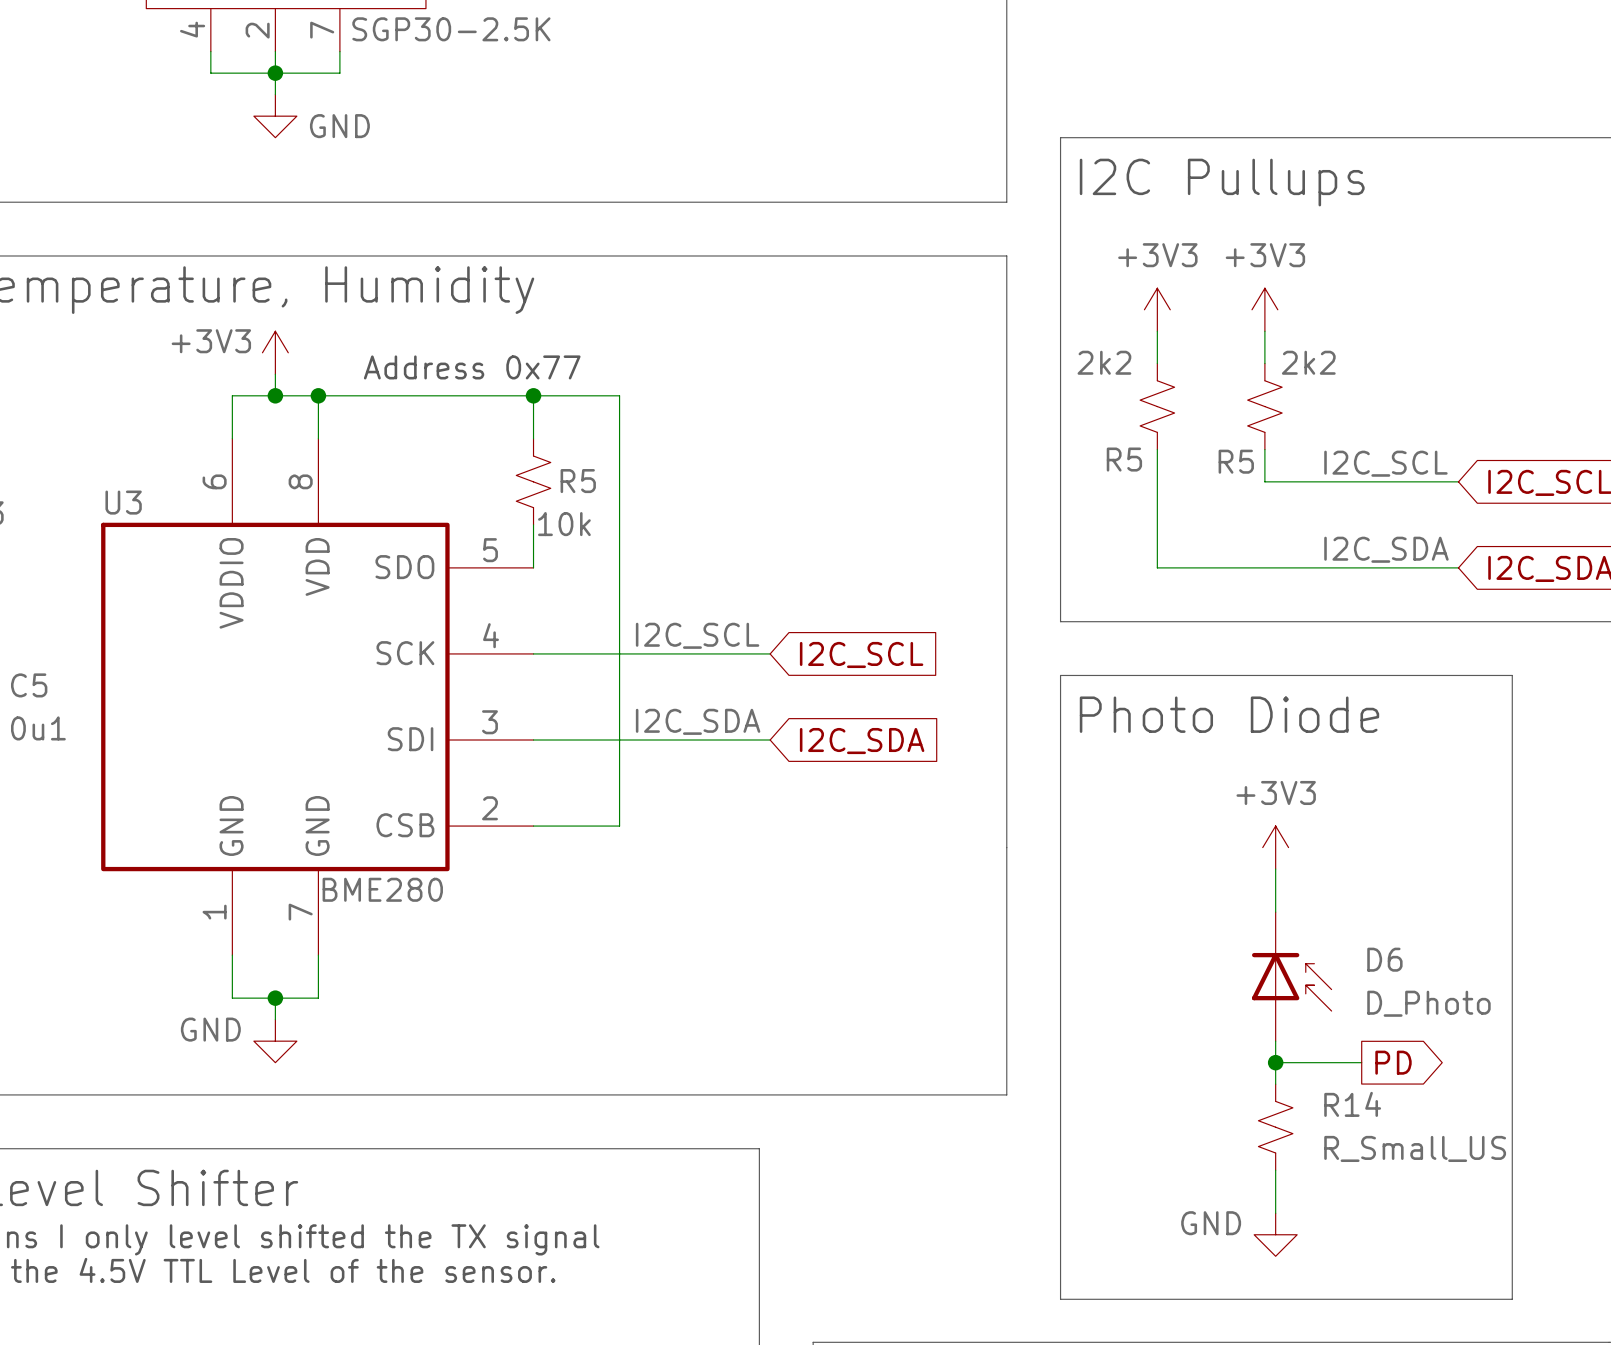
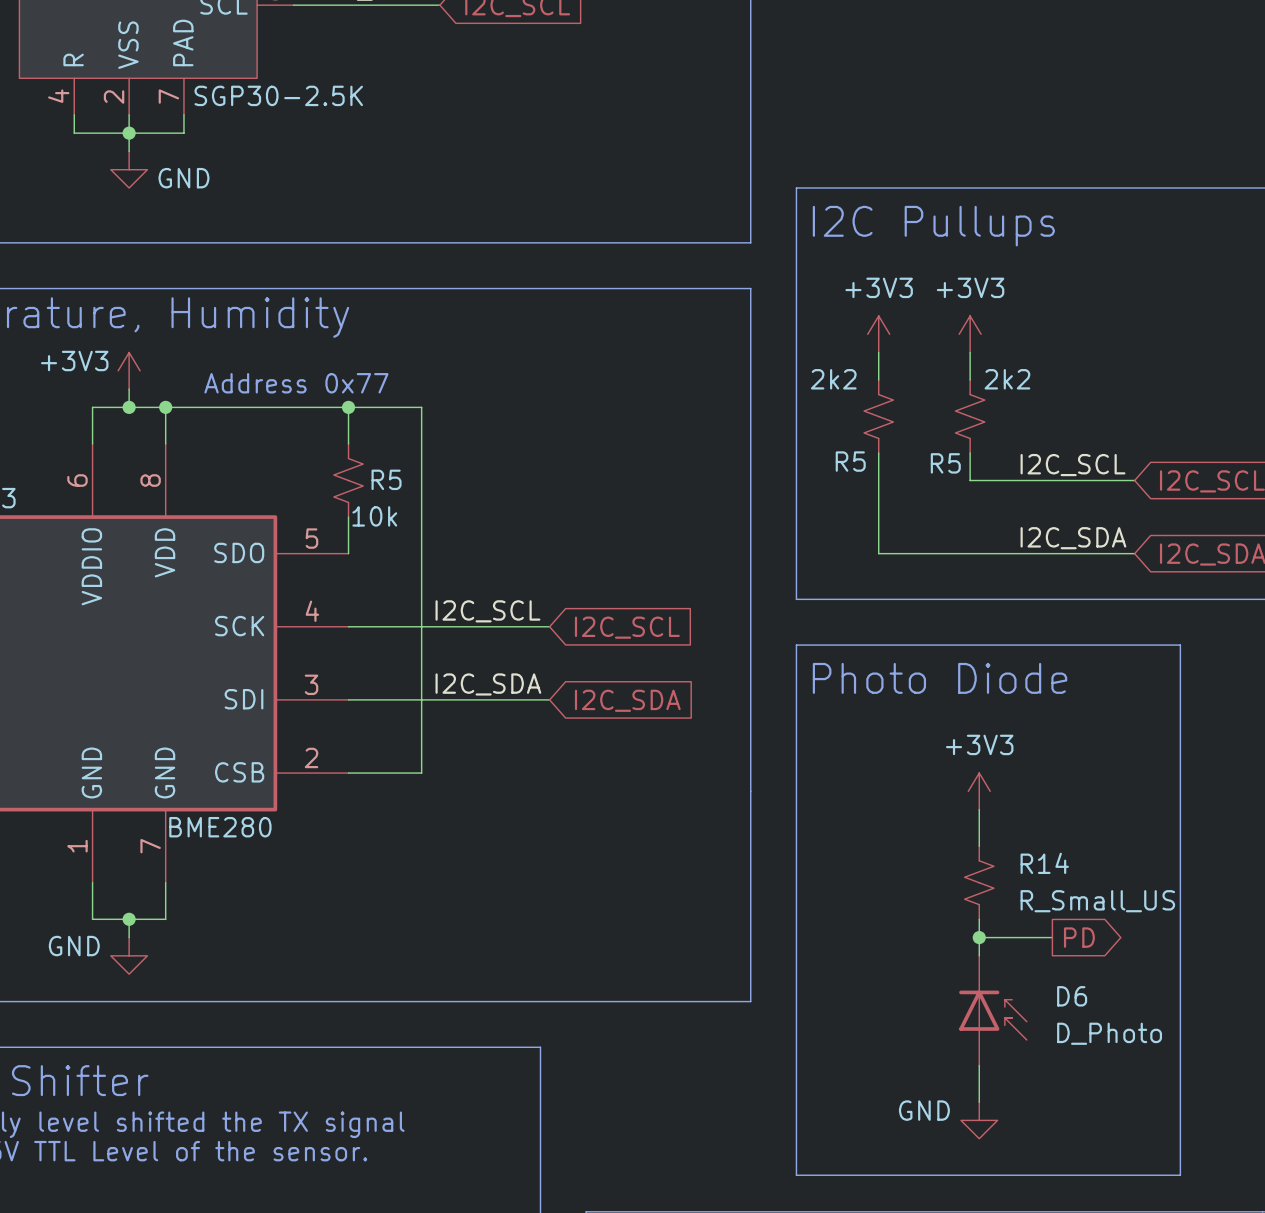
D6 position: (1291, 976) -> (992, 1010)
wire: (1275, 1062) (1361, 1062) -> (979, 937) (1052, 937)
junction position: (1275, 1062) -> (979, 937)
global label position: PD (1393, 1062) -> PD (1079, 937)
R14 position: (1275, 1127) -> (979, 882)

